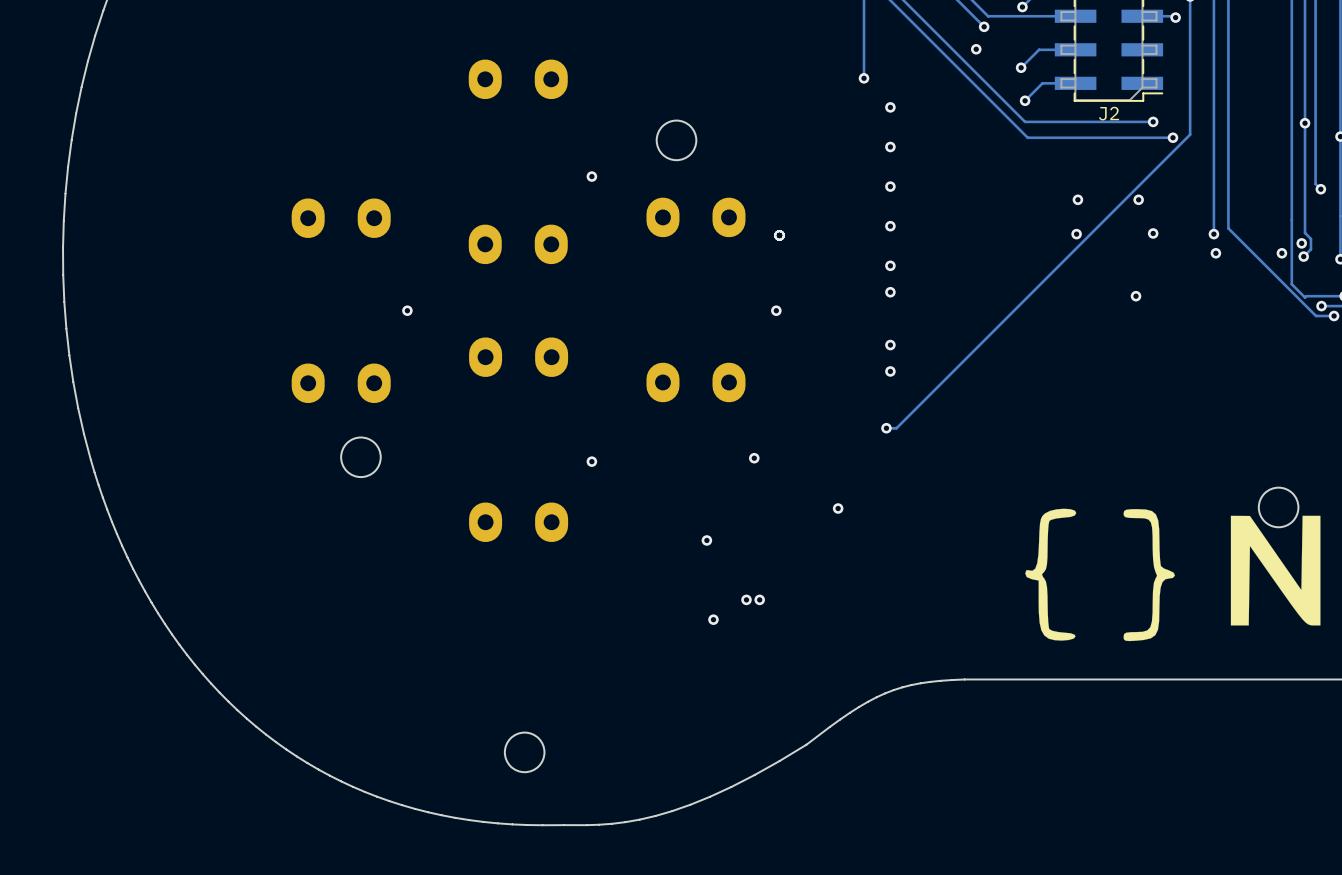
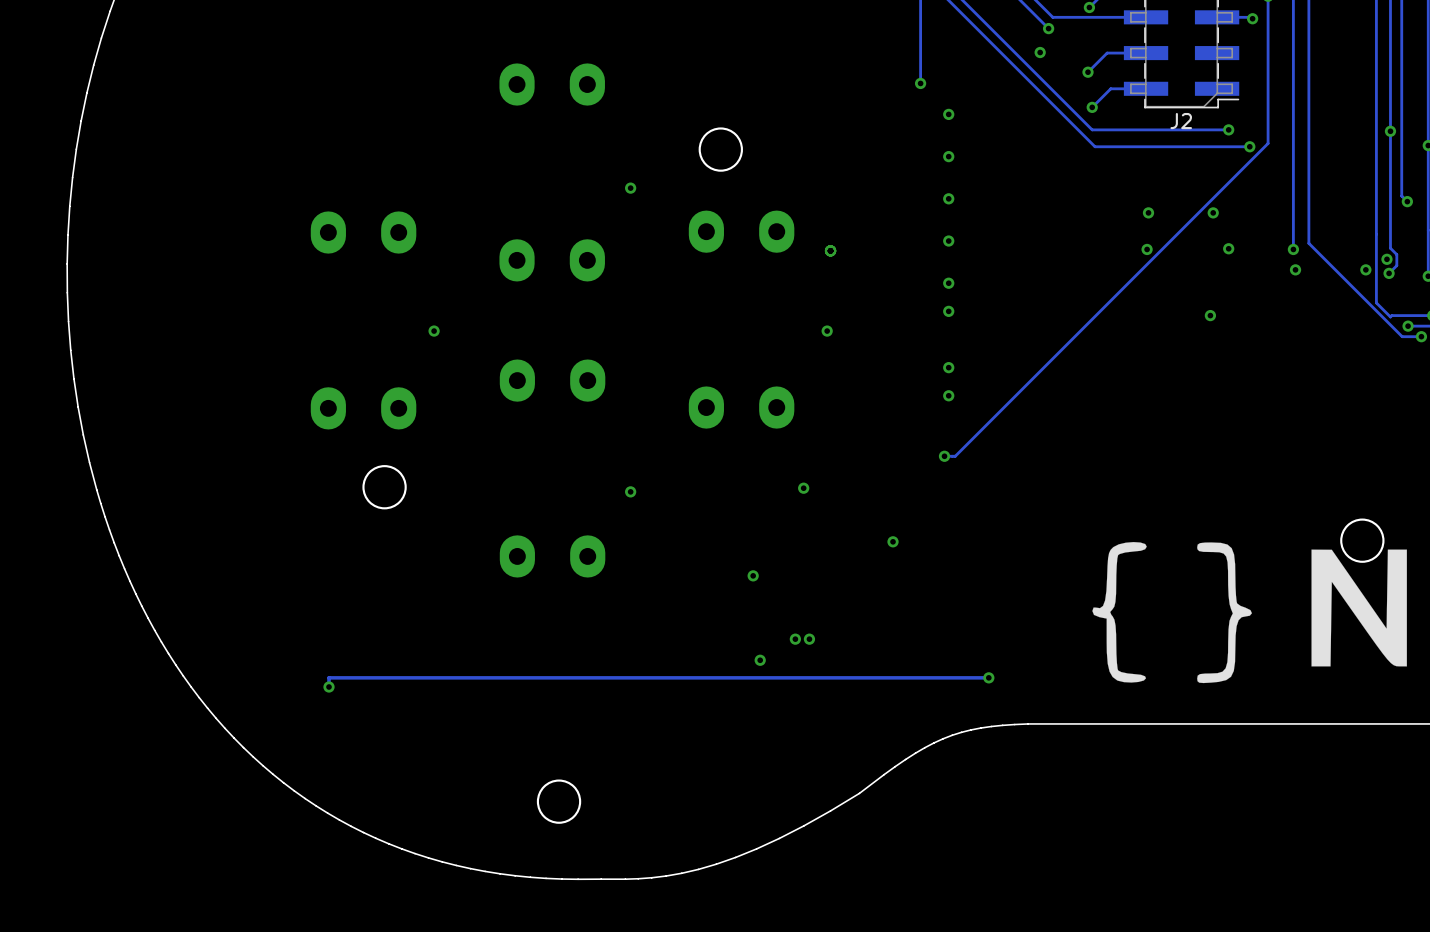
track: none -> (988, 677) (329, 677) (329, 687)
via: none -> (988, 677)
via: none -> (329, 687)

